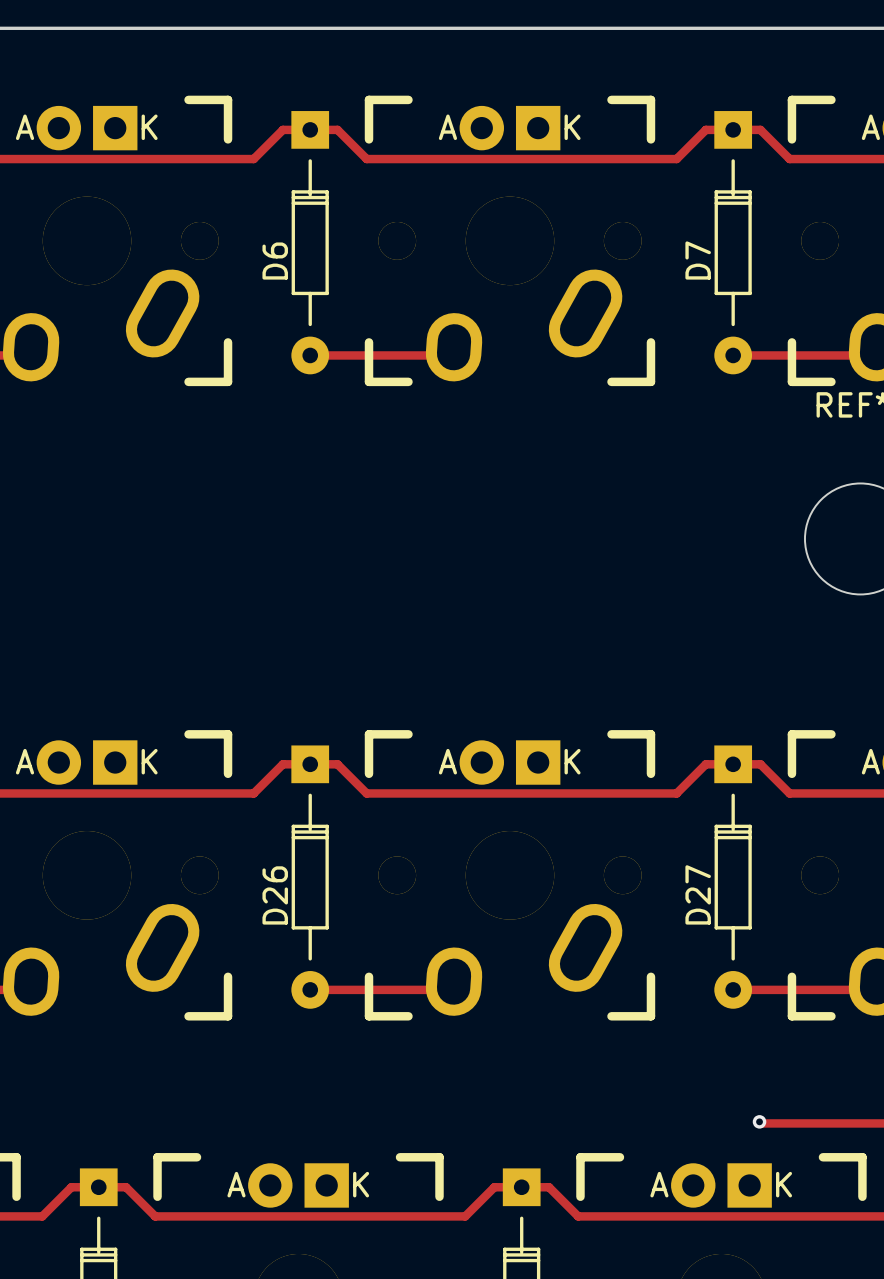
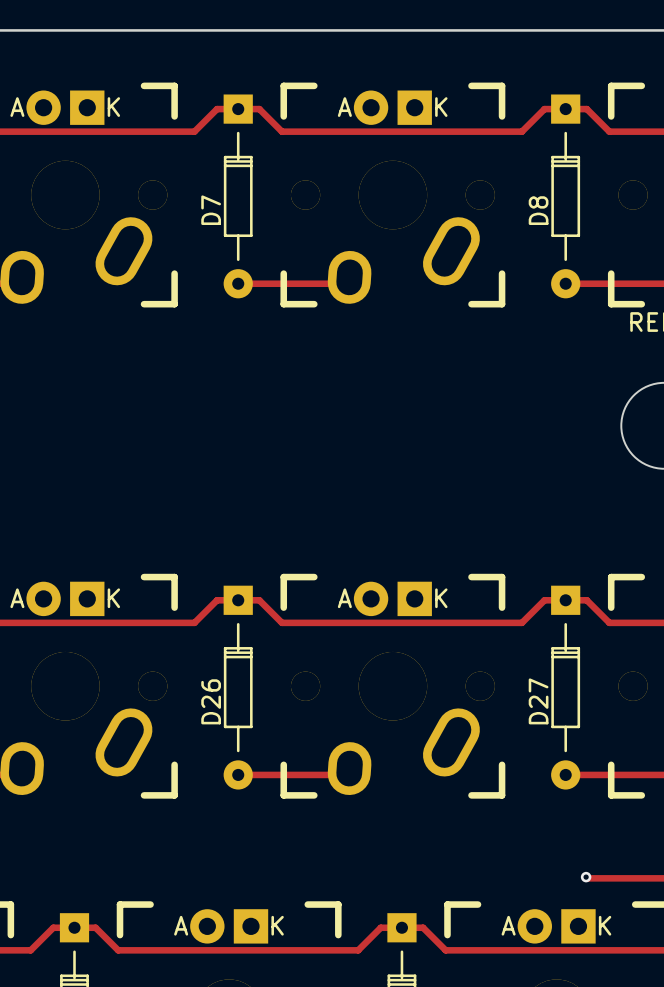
D7 name: D7 (698, 260) -> D8 (538, 210)
D6 name: D6 (275, 261) -> D7 (211, 210)

